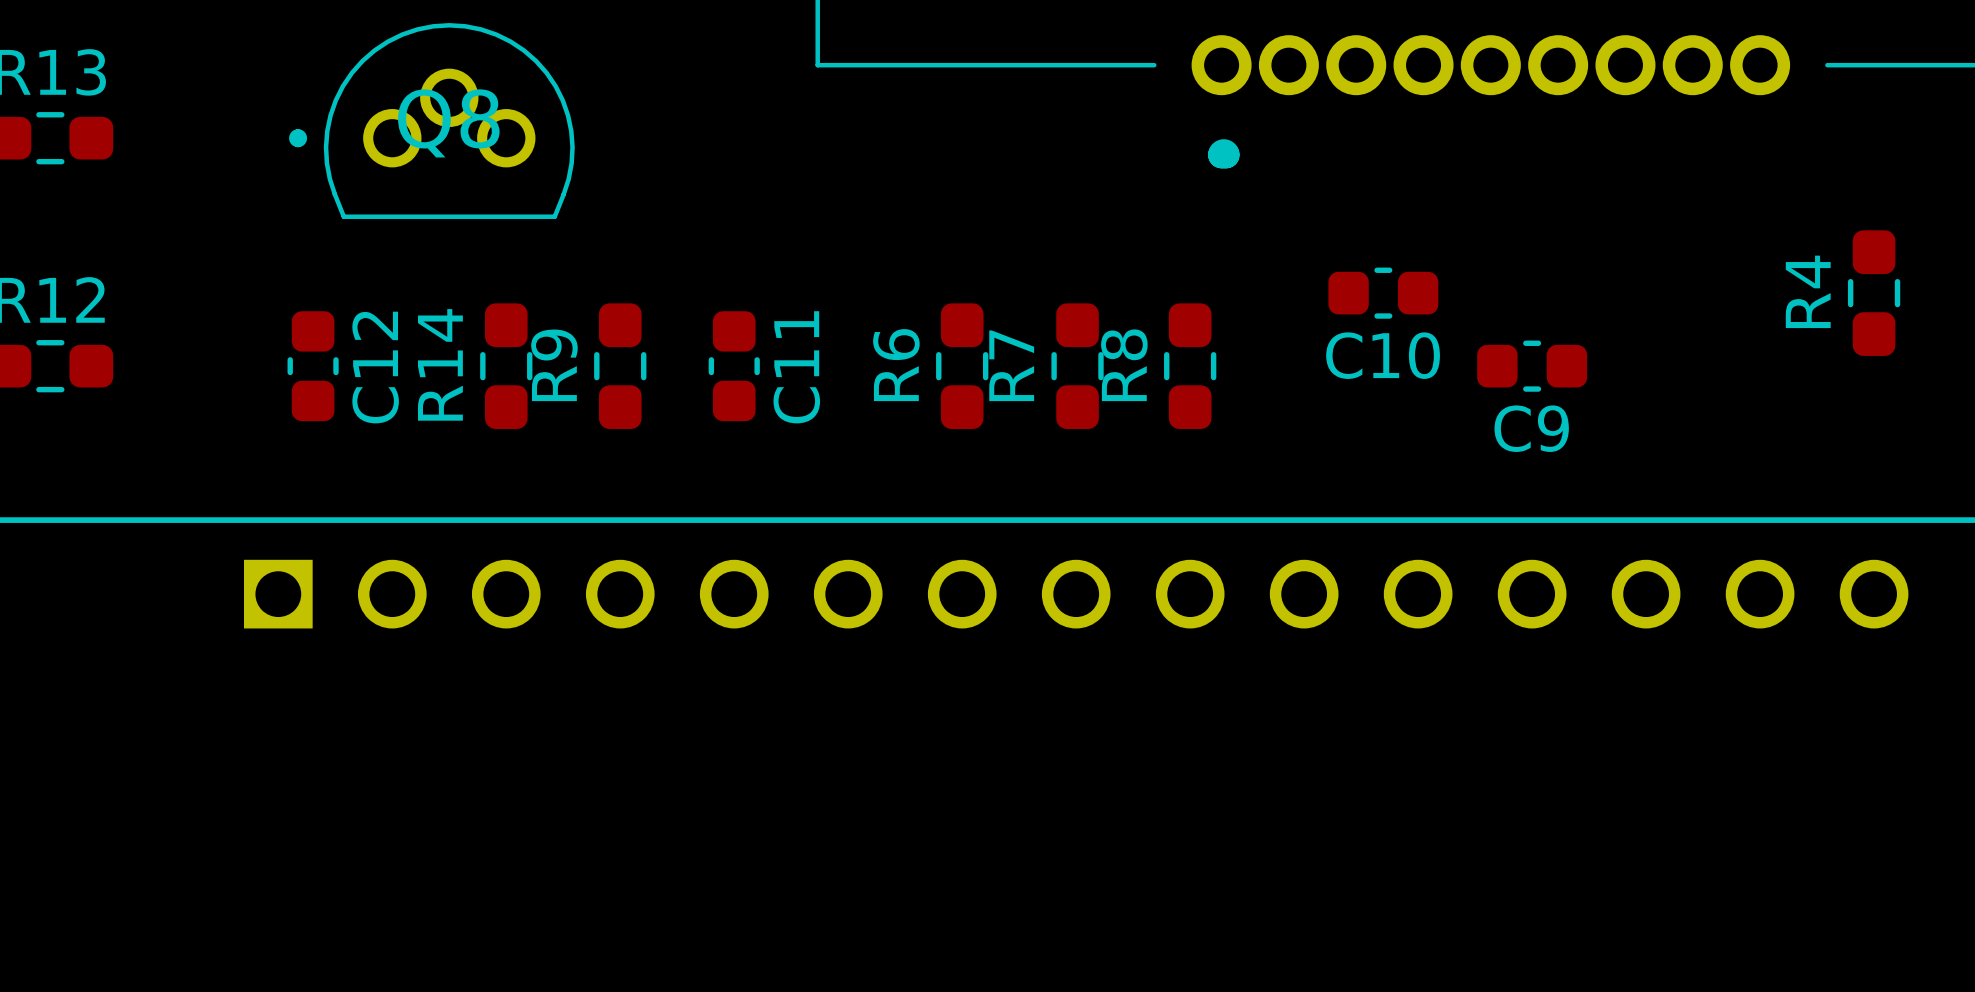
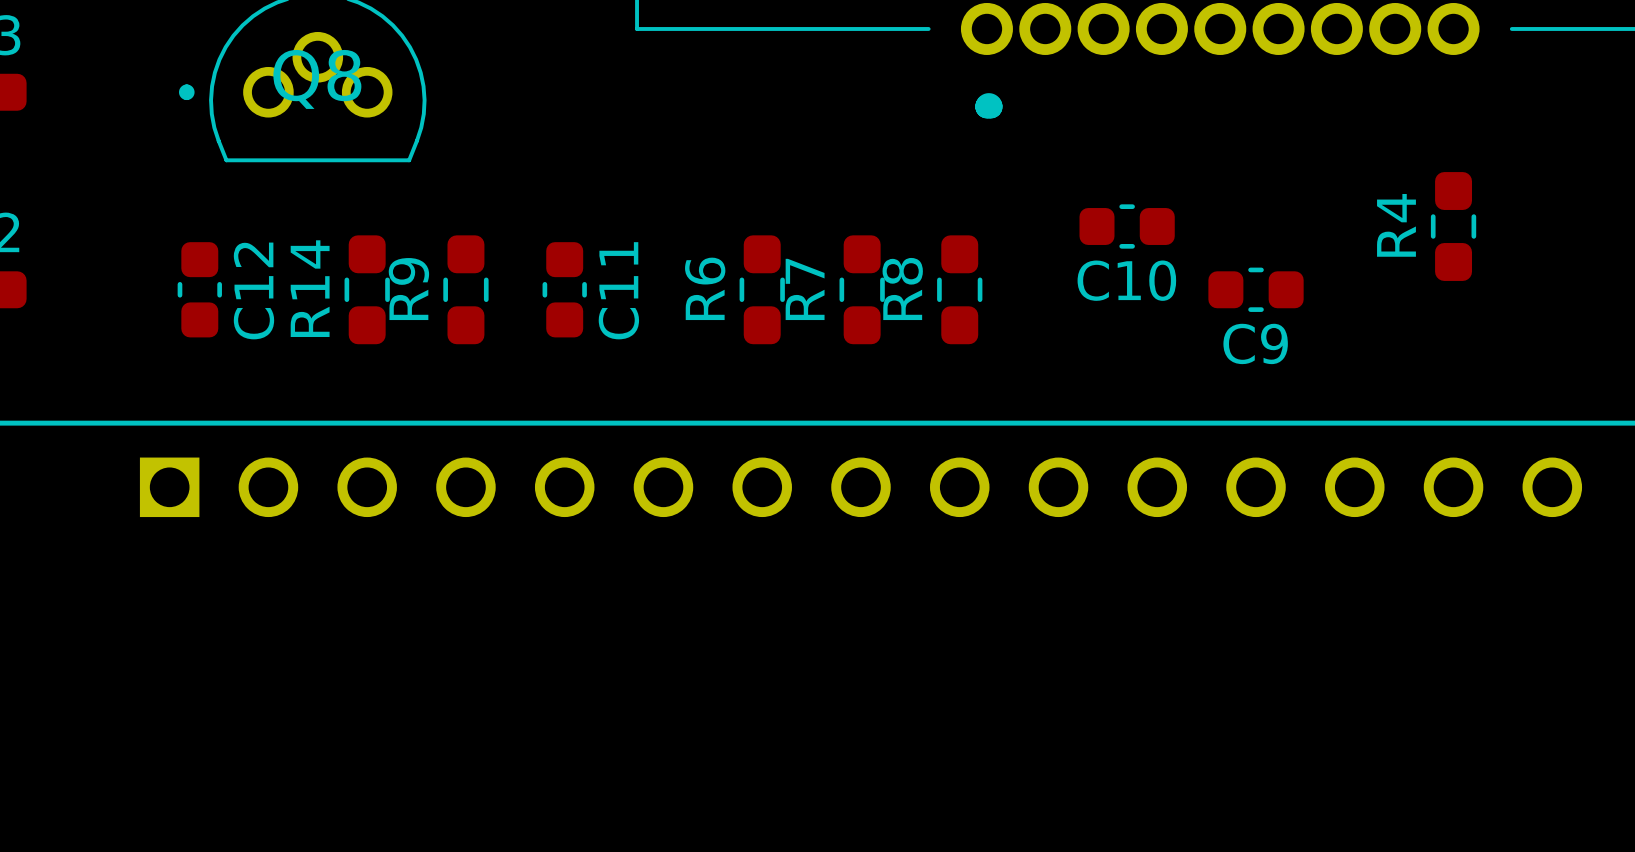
R4 position: (1874, 293) -> (1453, 226)

